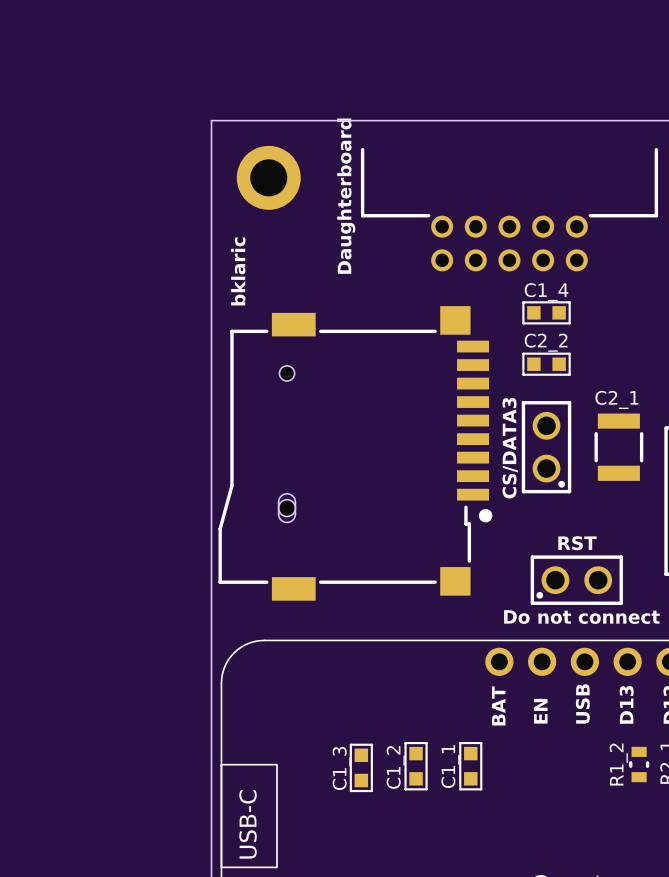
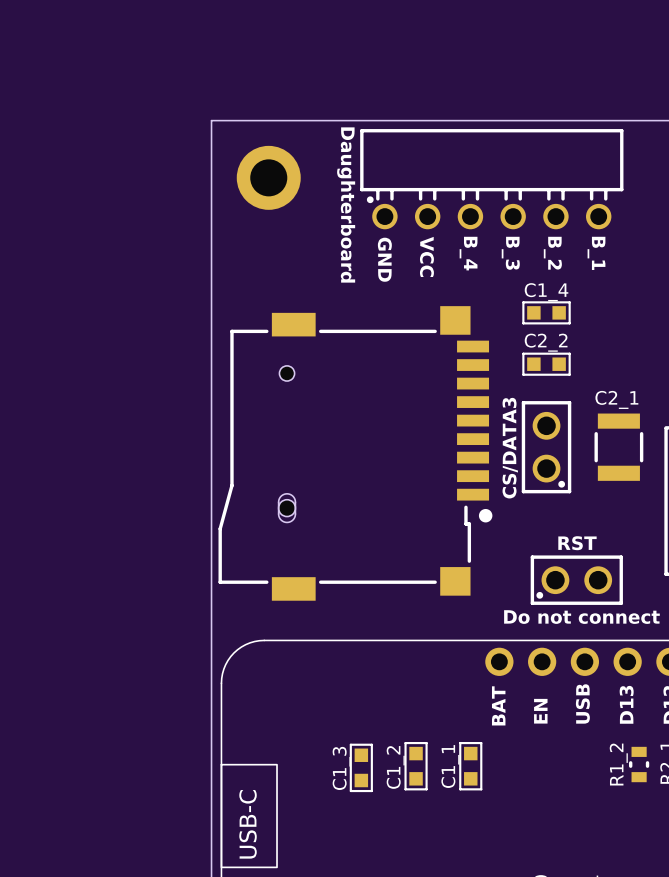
part: none -> (491, 179)
text rotation: 0° (346, 196) -> 180° (346, 204)
part: (509, 209) -> none
text: none -> B_4 (468, 253)
text: none -> B_3 (510, 253)
text: none -> B_2 (552, 253)
text: none -> B_1 (596, 253)
text: none -> VCC (426, 256)
text: none -> GND (384, 259)
text: bklaric (238, 271) -> none

